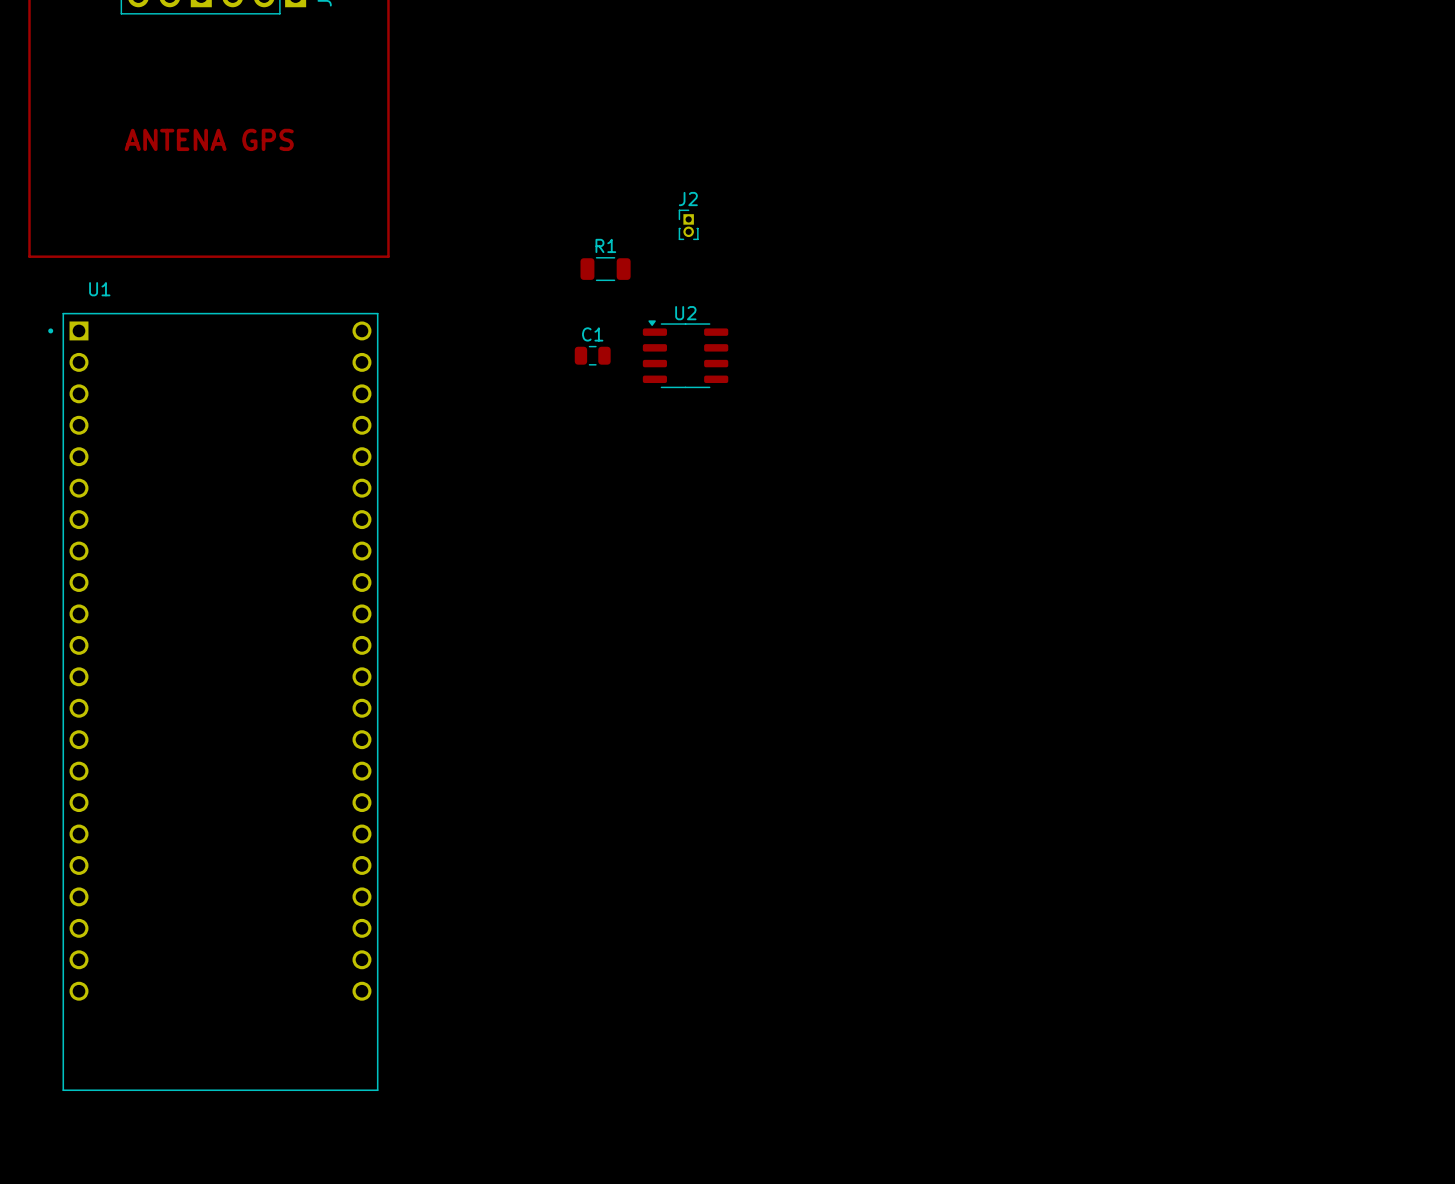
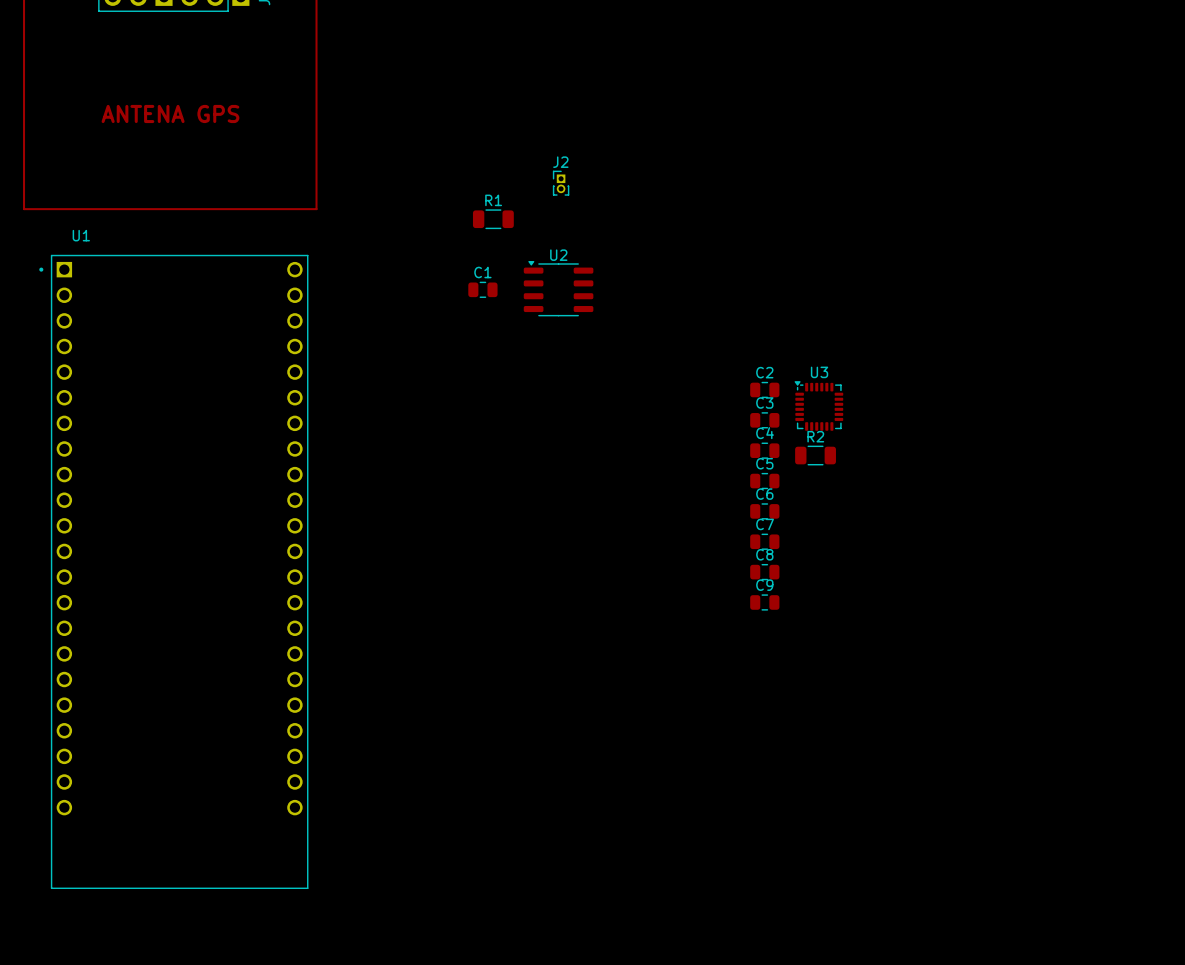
C2: none -> (764, 389)
U3: none -> (818, 405)
C3: none -> (764, 420)
C4: none -> (764, 450)
R2: none -> (815, 455)
C5: none -> (764, 481)
C6: none -> (764, 511)
C7: none -> (764, 541)
C8: none -> (764, 572)
C9: none -> (764, 602)

